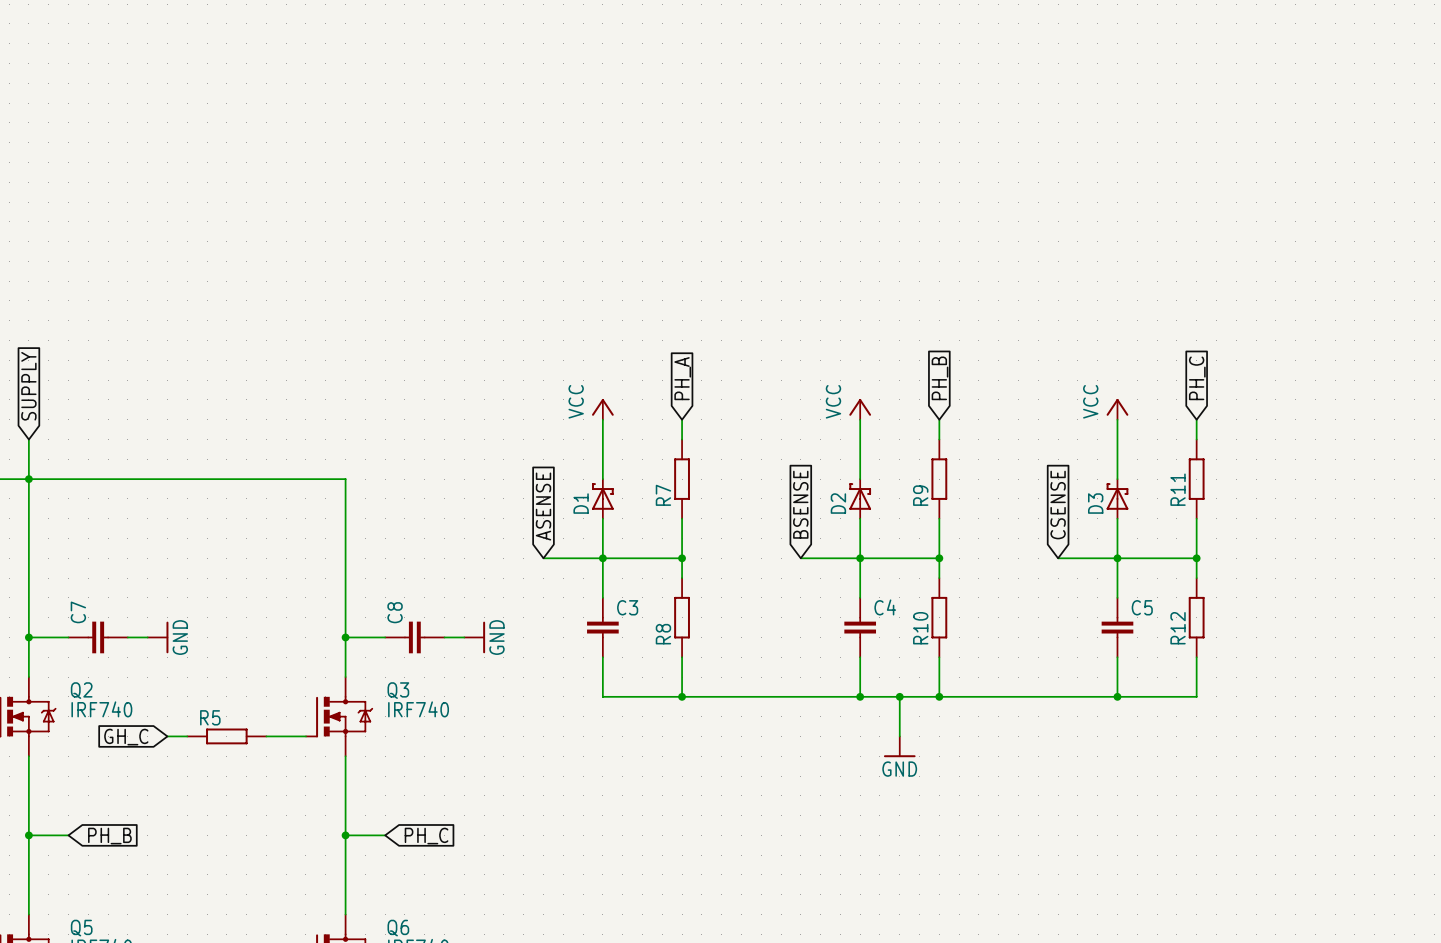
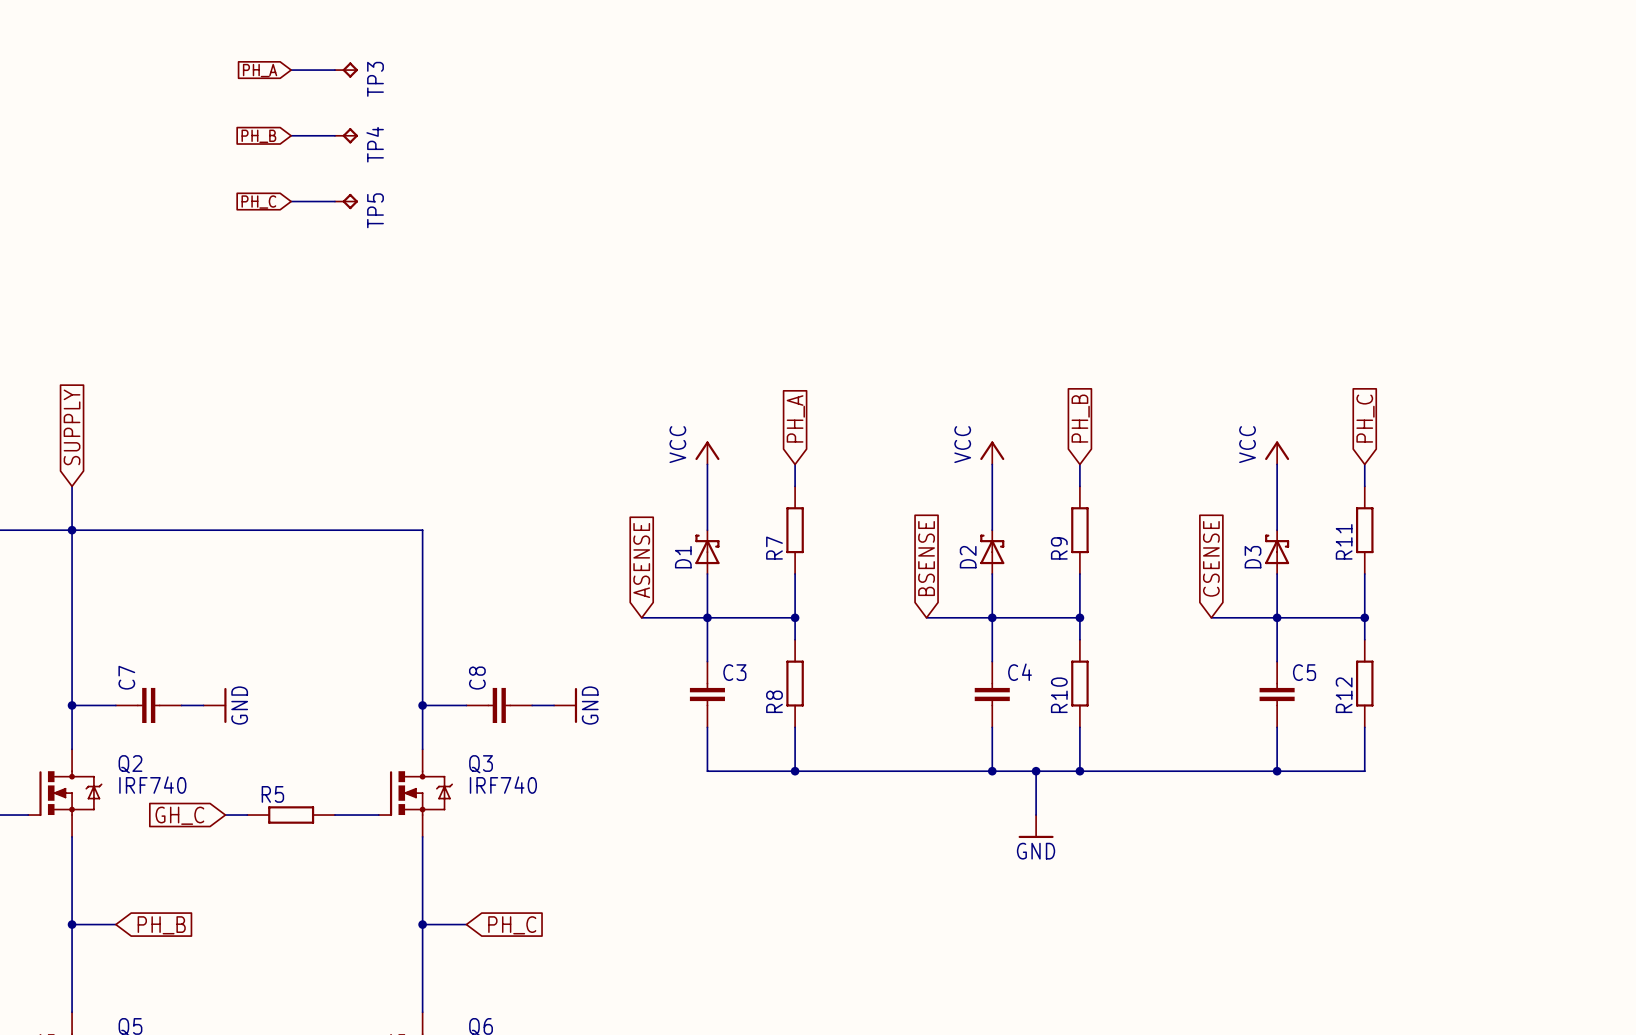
global label: none -> PH_A (260, 70)
wire: none -> (291, 70) (334, 70)
TP3: none -> (346, 70)
wire: none -> (291, 135) (334, 135)
TP4: none -> (346, 135)
global label: none -> PH_B (258, 136)
global label: none -> PH_C (258, 202)
wire: none -> (291, 201) (334, 201)
TP5: none -> (346, 201)

